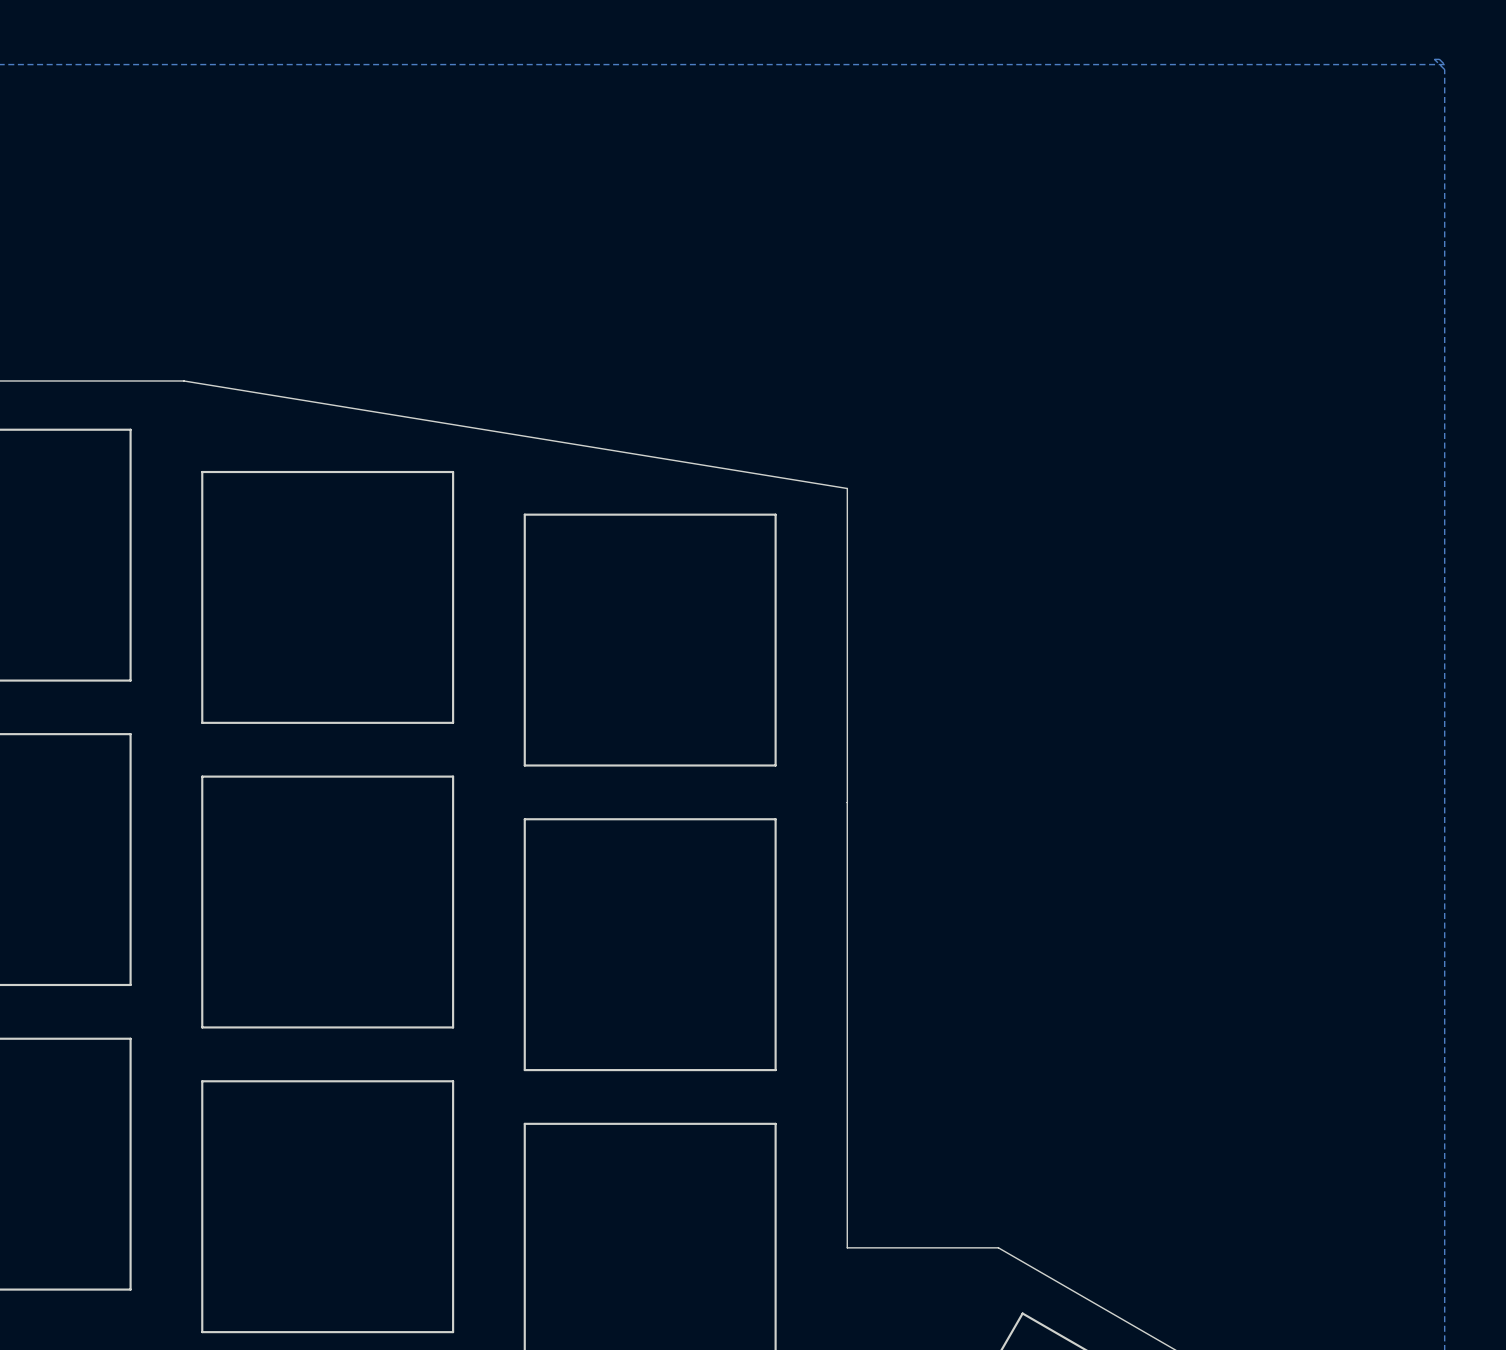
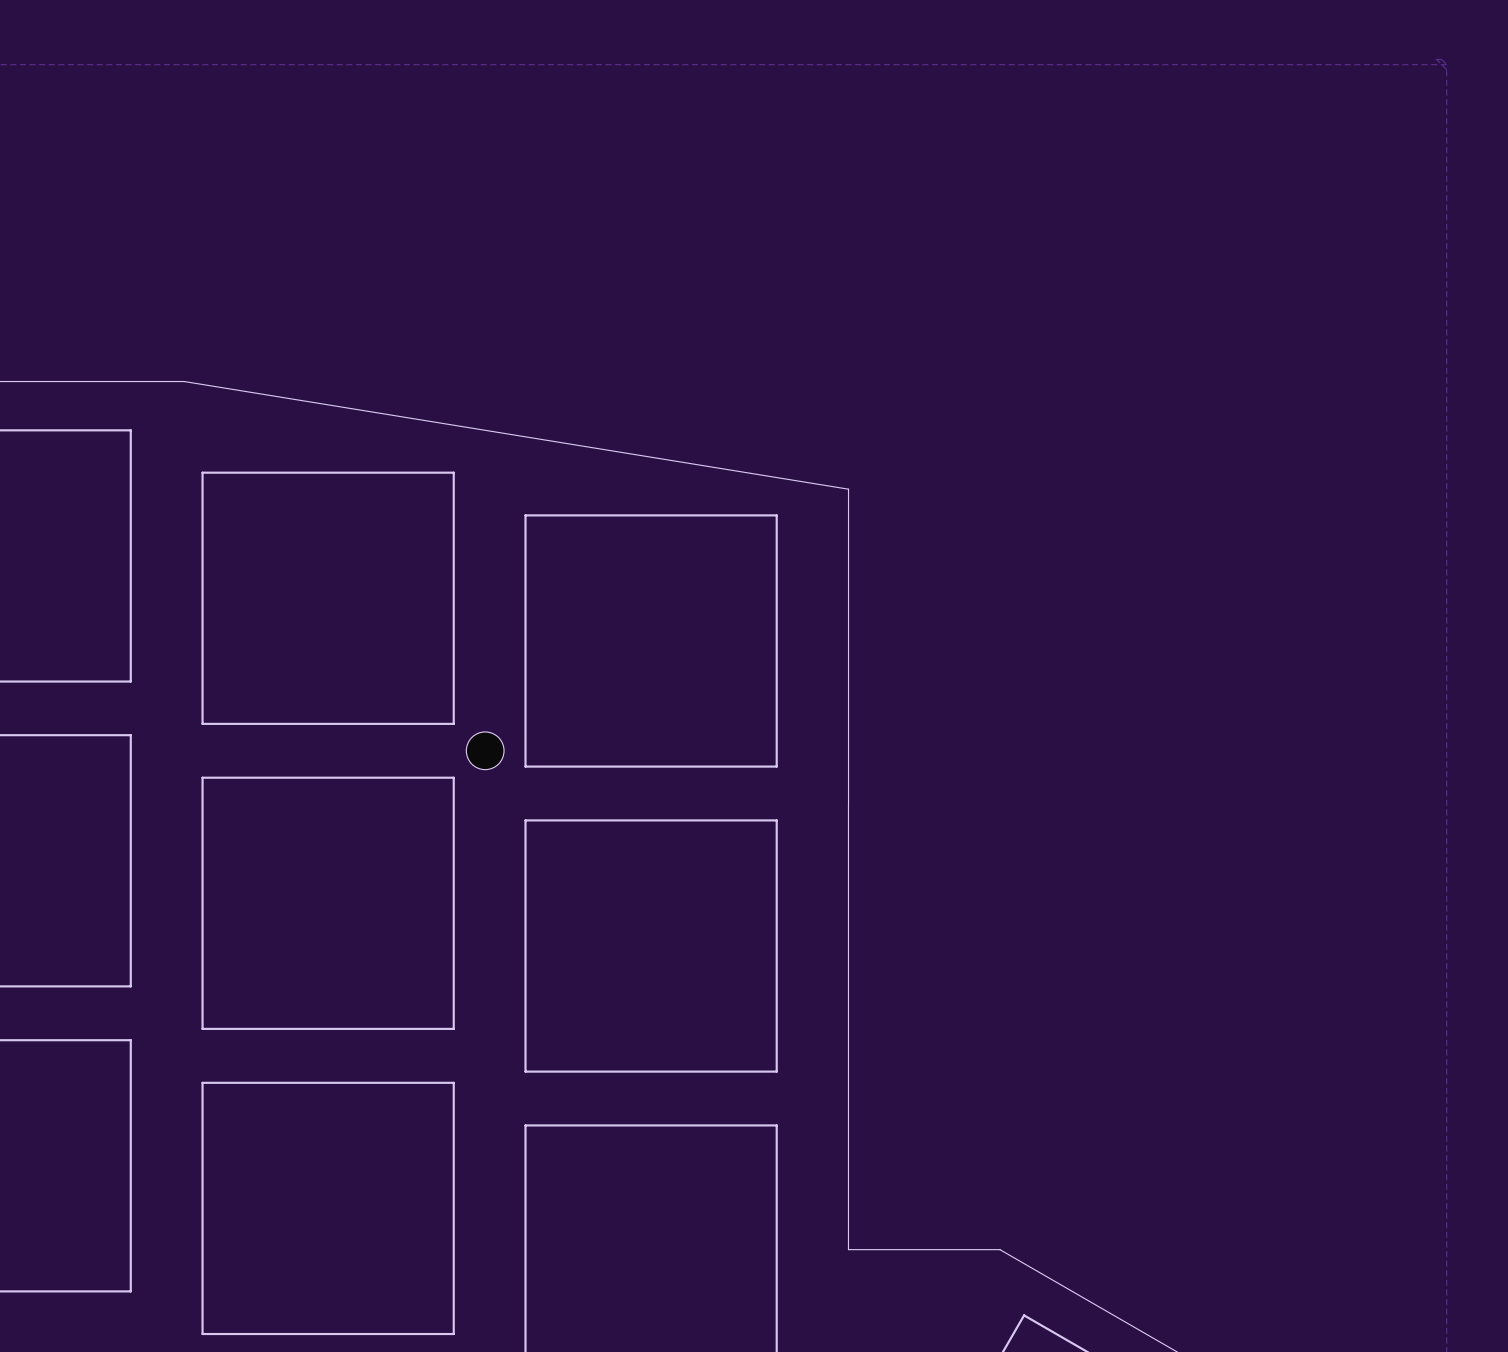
part: none -> (485, 750)

